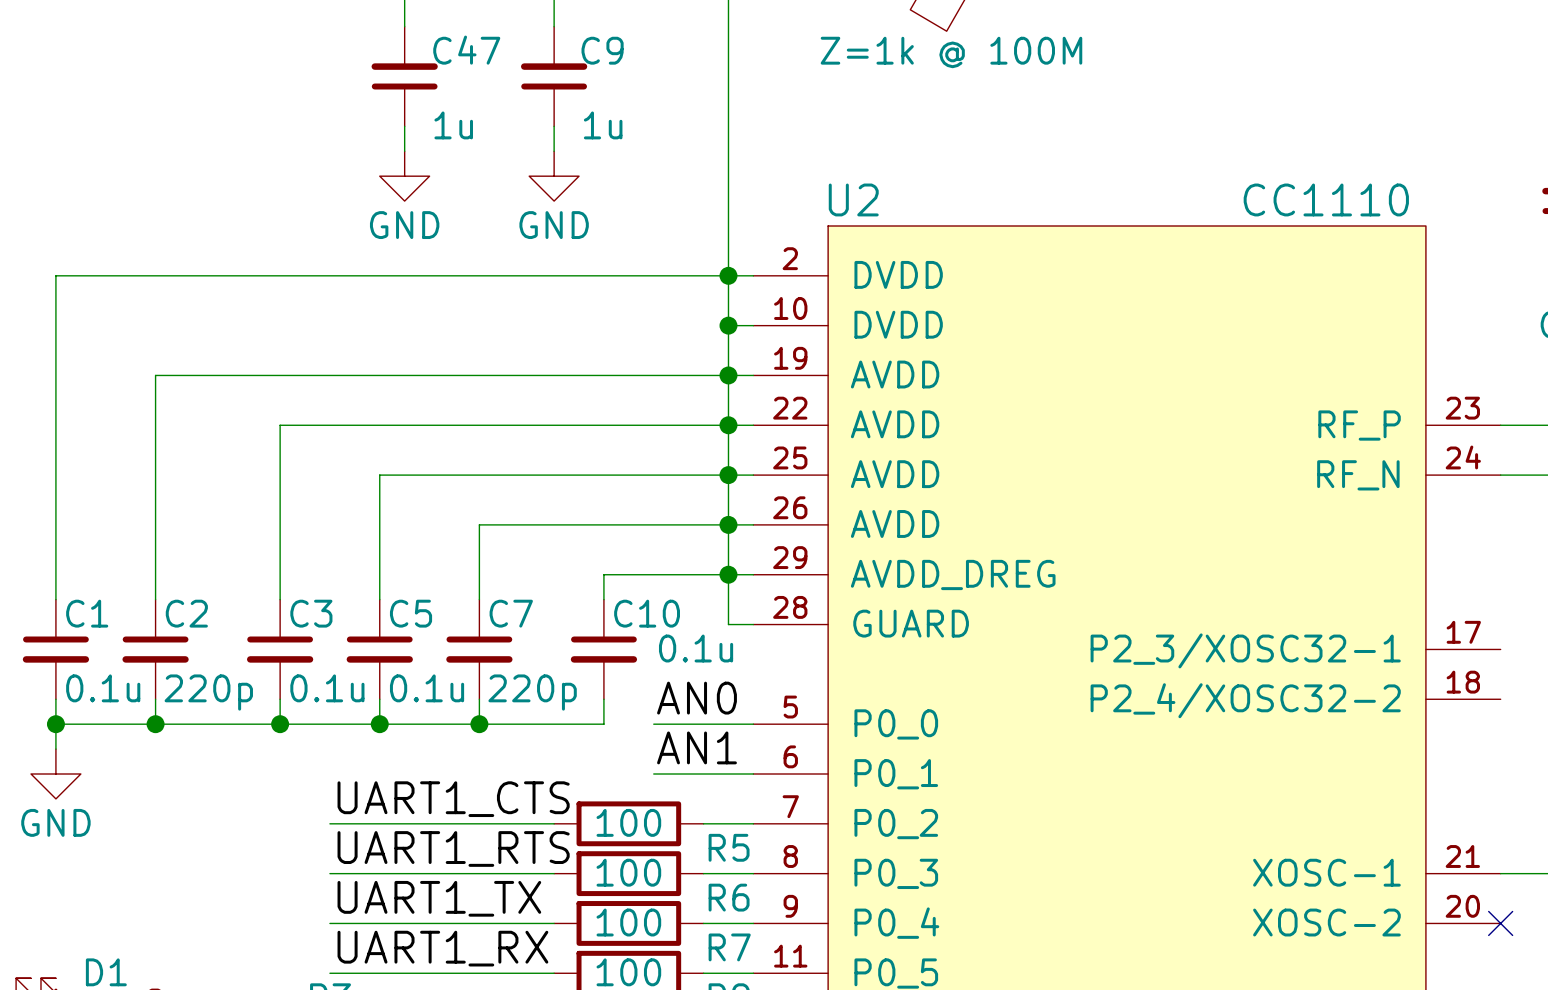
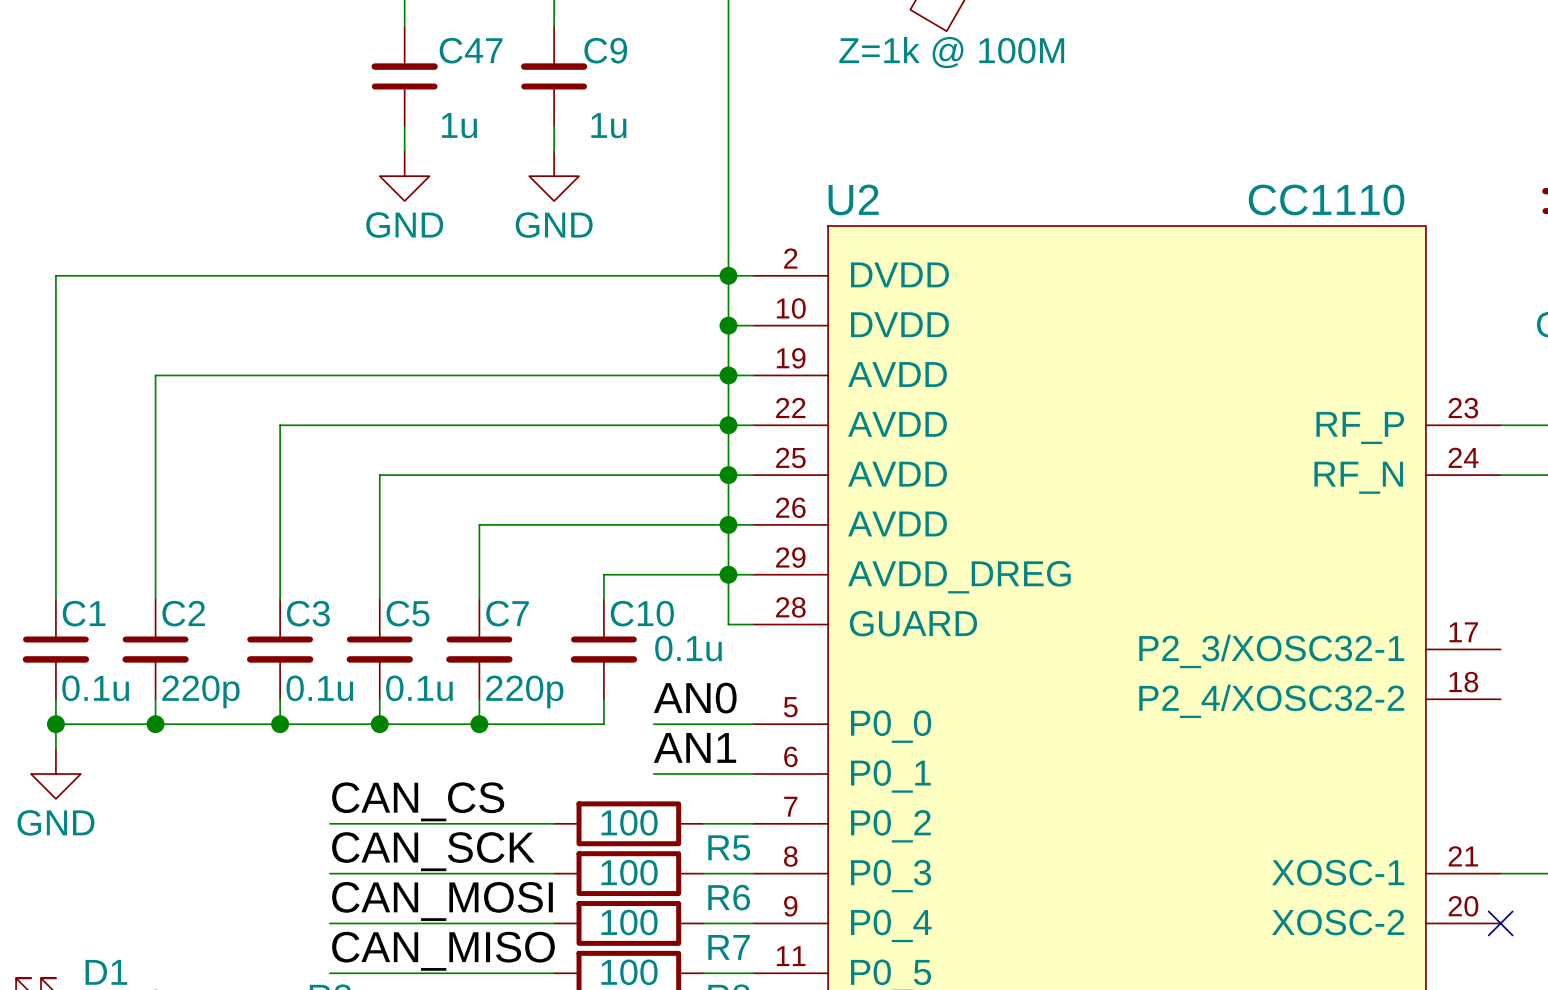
label: UART1_CTS (453, 799) -> CAN_CS (418, 801)
label: UART1_RTS (453, 848) -> CAN_SCK (433, 851)
label: UART1_TX (439, 898) -> CAN_MOSI (442, 901)
label: UART1_RX (442, 948) -> CAN_MISO (443, 951)

